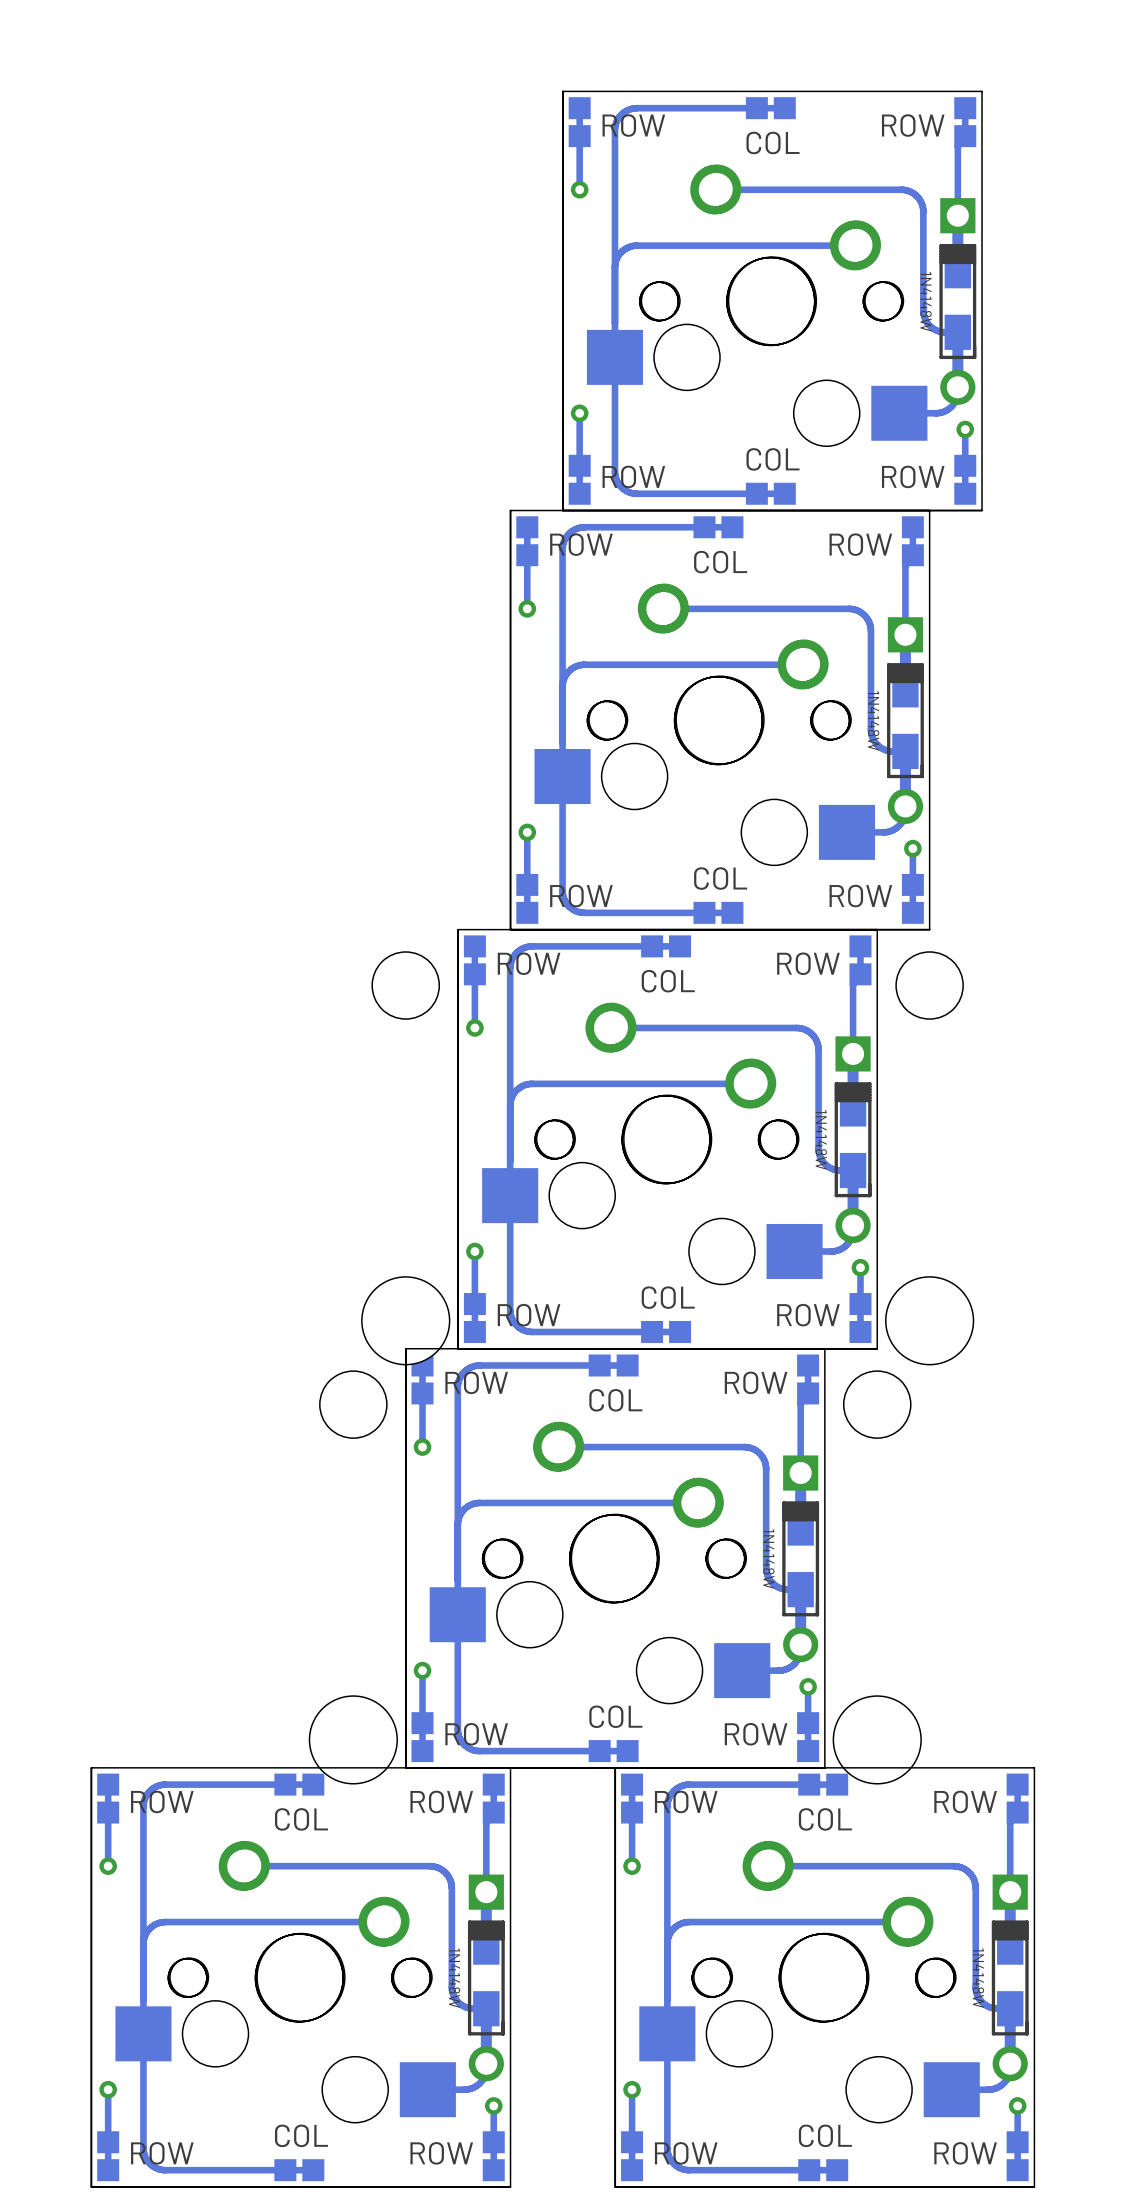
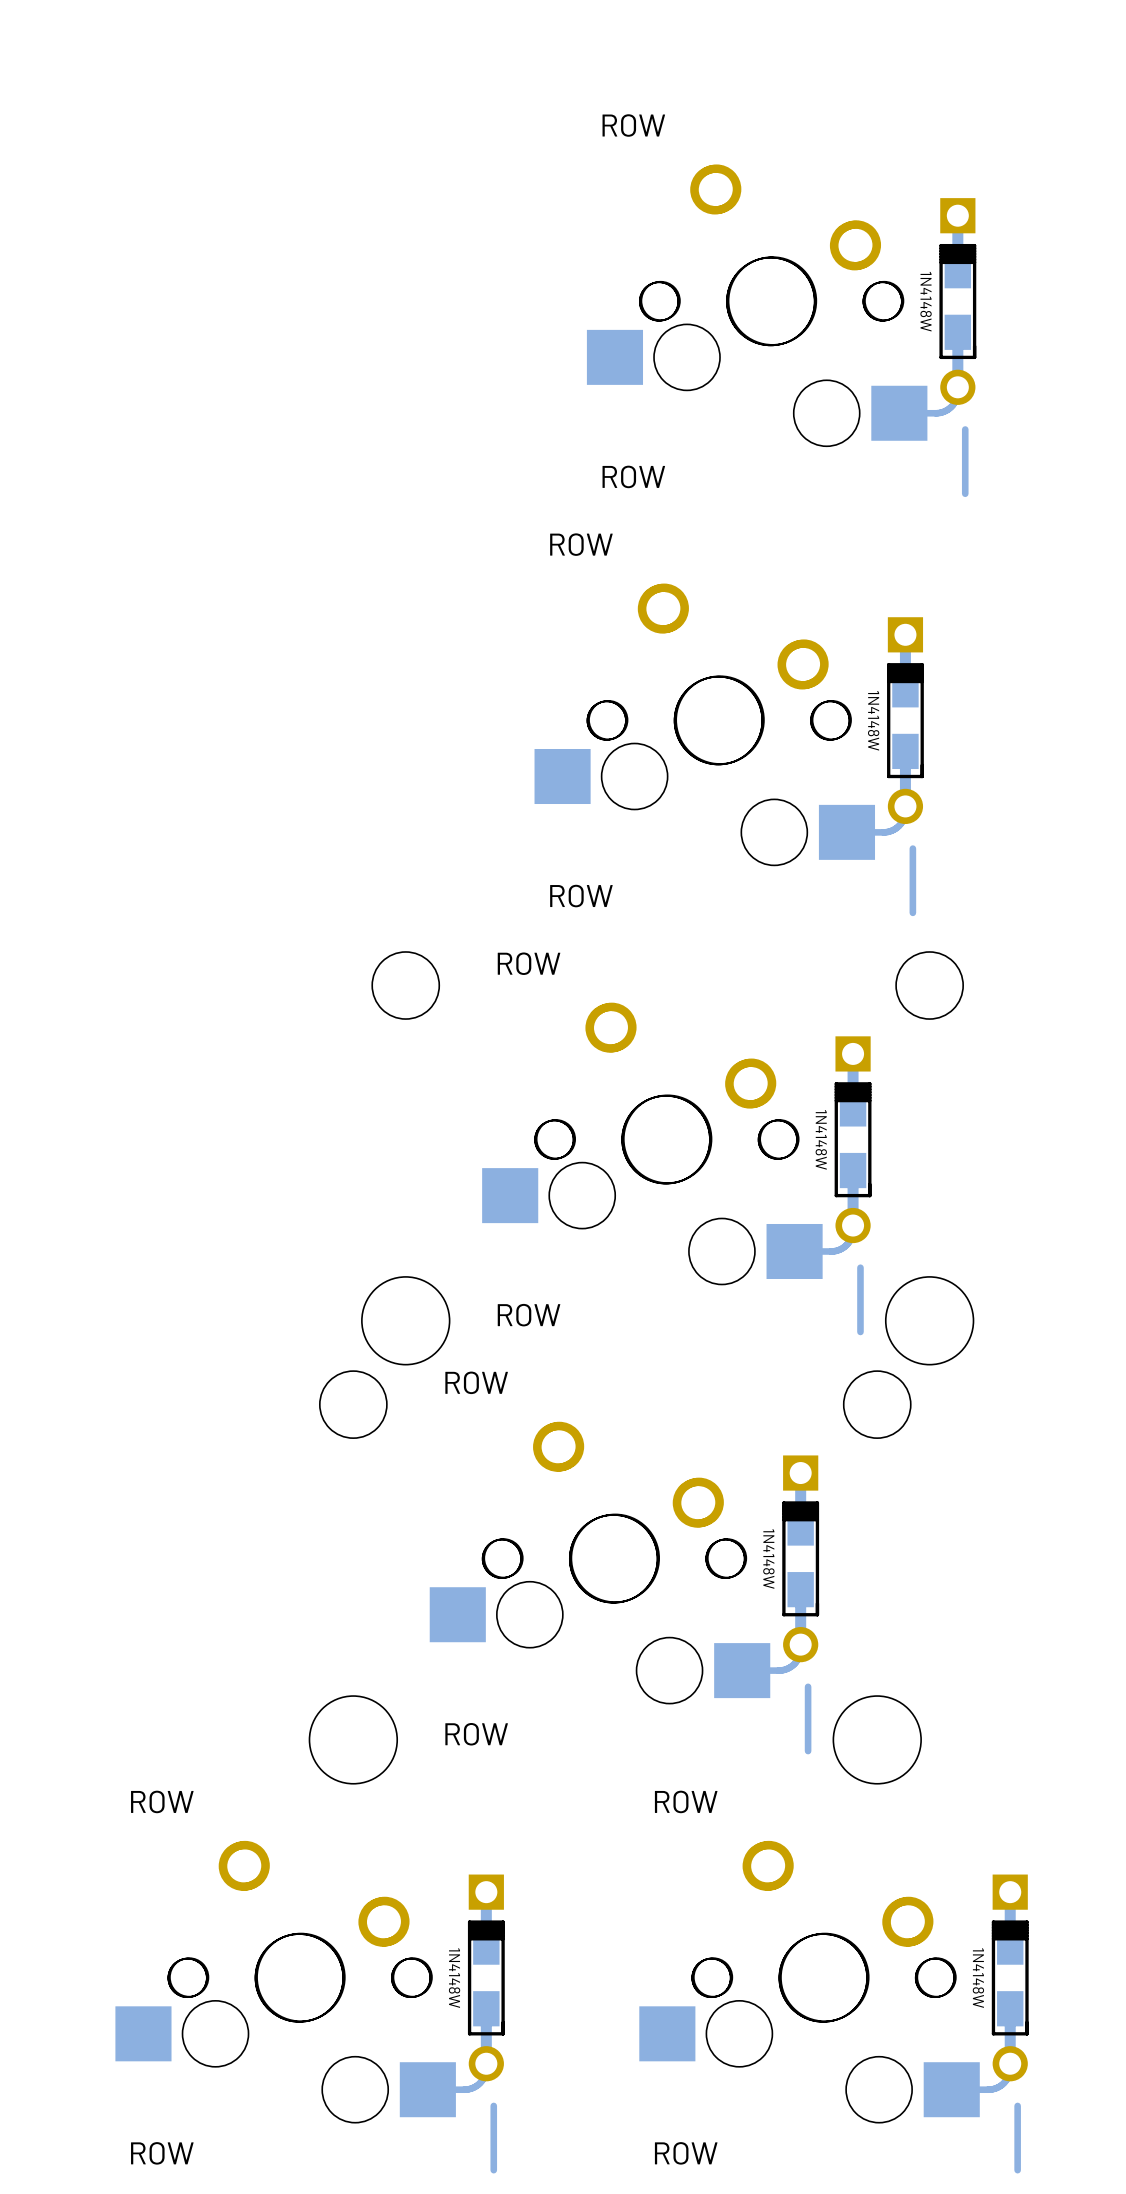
track: (579, 108) (579, 189) -> none
part: (770, 108) -> none
track: (784, 108) (634, 108) (621, 114) (616, 121) (614, 130) (614, 471) (616, 480) (623, 488) (634, 493) (784, 493) -> none
track: (965, 108) (965, 138) (957, 146) (957, 215) -> none
part: (579, 122) -> none
part: (965, 122) -> none
text: ROW (913, 125) -> none
text: COL (773, 142) -> none
via: (579, 189) -> none
track: (714, 189) (901, 189) (911, 192) (919, 199) (923, 209) (924, 316) (928, 324) (936, 330) (957, 332) -> none
track: (854, 245) (634, 245) (626, 248) (619, 253) (614, 267) -> none
track: (579, 413) (579, 493) -> none
via: (579, 413) -> none
via: (965, 429) -> none
text: COL (773, 459) -> none
text: ROW (913, 476) -> none
part: (579, 479) -> none
part: (965, 479) -> none
part: (770, 493) -> none
board edge: (562, 510) (562, 91) (982, 91) (982, 510) (510, 510) (510, 929) -> none
board edge: (929, 510) (929, 929) (458, 929) (458, 1348) -> none
track: (527, 527) (527, 608) -> none
part: (718, 527) -> none
track: (732, 527) (582, 527) (569, 533) (564, 540) (562, 549) (562, 890) (564, 899) (570, 907) (582, 912) (732, 912) -> none
track: (912, 527) (912, 558) (905, 565) (905, 634) -> none
part: (527, 541) -> none
part: (912, 541) -> none
text: ROW (860, 544) -> none
text: COL (720, 562) -> none
via: (527, 608) -> none
track: (662, 608) (848, 608) (859, 611) (867, 618) (870, 628) (871, 735) (875, 743) (884, 749) (905, 751) -> none
track: (802, 664) (582, 664) (574, 667) (567, 672) (562, 686) -> none
track: (527, 832) (527, 912) -> none
via: (527, 832) -> none
via: (912, 848) -> none
text: COL (720, 878) -> none
text: ROW (860, 896) -> none
part: (527, 898) -> none
part: (912, 898) -> none
part: (718, 912) -> none
board edge: (877, 929) (877, 1348) (405, 1348) (405, 1767) -> none
track: (474, 946) (474, 1027) -> none
part: (666, 946) -> none
track: (680, 946) (530, 946) (516, 952) (511, 959) (510, 968) (510, 1309) (511, 1318) (518, 1326) (530, 1331) (680, 1331) -> none
track: (860, 946) (860, 977) (853, 984) (853, 1053) -> none
part: (474, 960) -> none
part: (860, 960) -> none
text: ROW (808, 963) -> none
text: COL (668, 981) -> none
via: (474, 1027) -> none
track: (610, 1027) (796, 1027) (806, 1030) (814, 1037) (818, 1047) (819, 1154) (823, 1162) (832, 1168) (853, 1170) -> none
track: (749, 1083) (530, 1083) (521, 1086) (515, 1091) (510, 1105) -> none
track: (474, 1251) (474, 1331) -> none
via: (474, 1251) -> none
via: (860, 1267) -> none
text: COL (668, 1297) -> none
text: ROW (808, 1315) -> none
part: (474, 1318) -> none
part: (860, 1318) -> none
part: (666, 1331) -> none
board edge: (824, 1348) (824, 1767) -> none
track: (422, 1365) (422, 1447) -> none
part: (613, 1365) -> none
track: (627, 1365) (477, 1365) (464, 1371) (459, 1379) (457, 1387) (457, 1729) (459, 1737) (465, 1746) (477, 1750) (627, 1751) -> none
track: (808, 1365) (808, 1396) (800, 1403) (800, 1473) -> none
part: (422, 1379) -> none
part: (808, 1379) -> none
text: ROW (756, 1382) -> none
text: COL (615, 1400) -> none
via: (422, 1447) -> none
track: (557, 1447) (744, 1447) (754, 1449) (762, 1456) (766, 1466) (767, 1574) (771, 1581) (779, 1587) (800, 1589) -> none
track: (697, 1502) (477, 1503) (469, 1505) (462, 1511) (457, 1524) -> none
track: (422, 1670) (422, 1751) -> none
via: (422, 1670) -> none
via: (808, 1686) -> none
text: COL (615, 1716) -> none
text: ROW (756, 1734) -> none
part: (422, 1737) -> none
part: (808, 1737) -> none
part: (613, 1751) -> none
board edge: (615, 1767) (615, 2186) (1034, 2186) (1034, 1767) (91, 1767) (91, 2186) (510, 2186) (510, 1767) -> none
track: (108, 1784) (108, 1866) -> none
part: (299, 1784) -> none
track: (313, 1784) (163, 1784) (149, 1791) (145, 1798) (143, 1806) (143, 2148) (145, 2156) (151, 2165) (163, 2170) (313, 2170) -> none
track: (493, 1784) (493, 1815) (486, 1822) (486, 1892) -> none
track: (632, 1784) (632, 1866) -> none
part: (823, 1784) -> none
track: (837, 1784) (687, 1784) (673, 1791) (669, 1798) (667, 1806) (667, 2148) (669, 2156) (675, 2165) (687, 2170) (837, 2170) -> none
track: (1017, 1784) (1017, 1815) (1010, 1822) (1010, 1892) -> none
part: (108, 1798) -> none
part: (493, 1798) -> none
part: (632, 1798) -> none
part: (1017, 1798) -> none
text: ROW (441, 1801) -> none
text: ROW (965, 1801) -> none
text: COL (301, 1819) -> none
text: COL (825, 1819) -> none
via: (108, 1866) -> none
track: (243, 1866) (429, 1866) (440, 1868) (448, 1875) (451, 1886) (452, 1993) (456, 2000) (465, 2007) (486, 2008) -> none
via: (632, 1866) -> none
track: (767, 1866) (953, 1866) (964, 1868) (972, 1875) (975, 1886) (976, 1993) (980, 2000) (989, 2007) (1010, 2008) -> none
track: (383, 1922) (163, 1922) (155, 1924) (148, 1930) (143, 1944) -> none
track: (907, 1922) (687, 1922) (678, 1924) (672, 1930) (667, 1944) -> none
track: (108, 2089) (108, 2170) -> none
via: (108, 2089) -> none
track: (632, 2089) (632, 2170) -> none
via: (632, 2089) -> none
via: (493, 2105) -> none
via: (1017, 2105) -> none
text: COL (301, 2135) -> none
text: COL (825, 2135) -> none
text: ROW (441, 2153) -> none
text: ROW (965, 2153) -> none
part: (108, 2156) -> none
part: (493, 2156) -> none
part: (632, 2156) -> none
part: (1017, 2156) -> none
part: (299, 2170) -> none
part: (823, 2170) -> none

